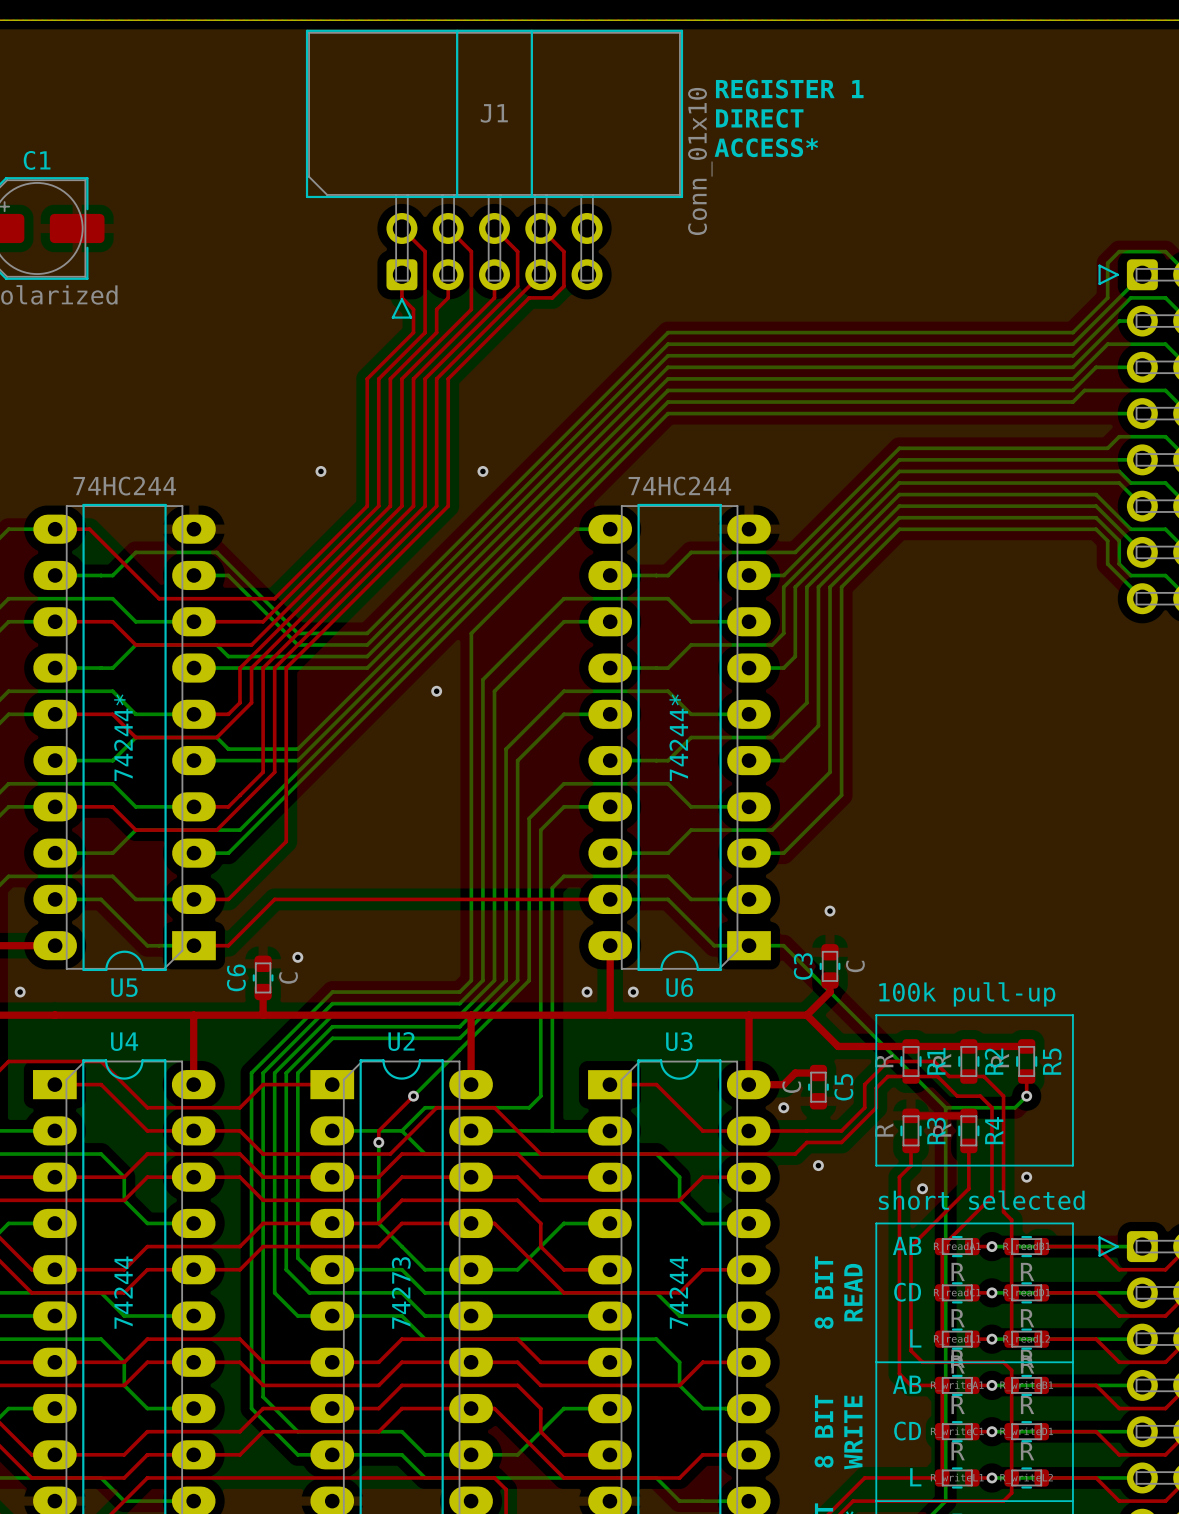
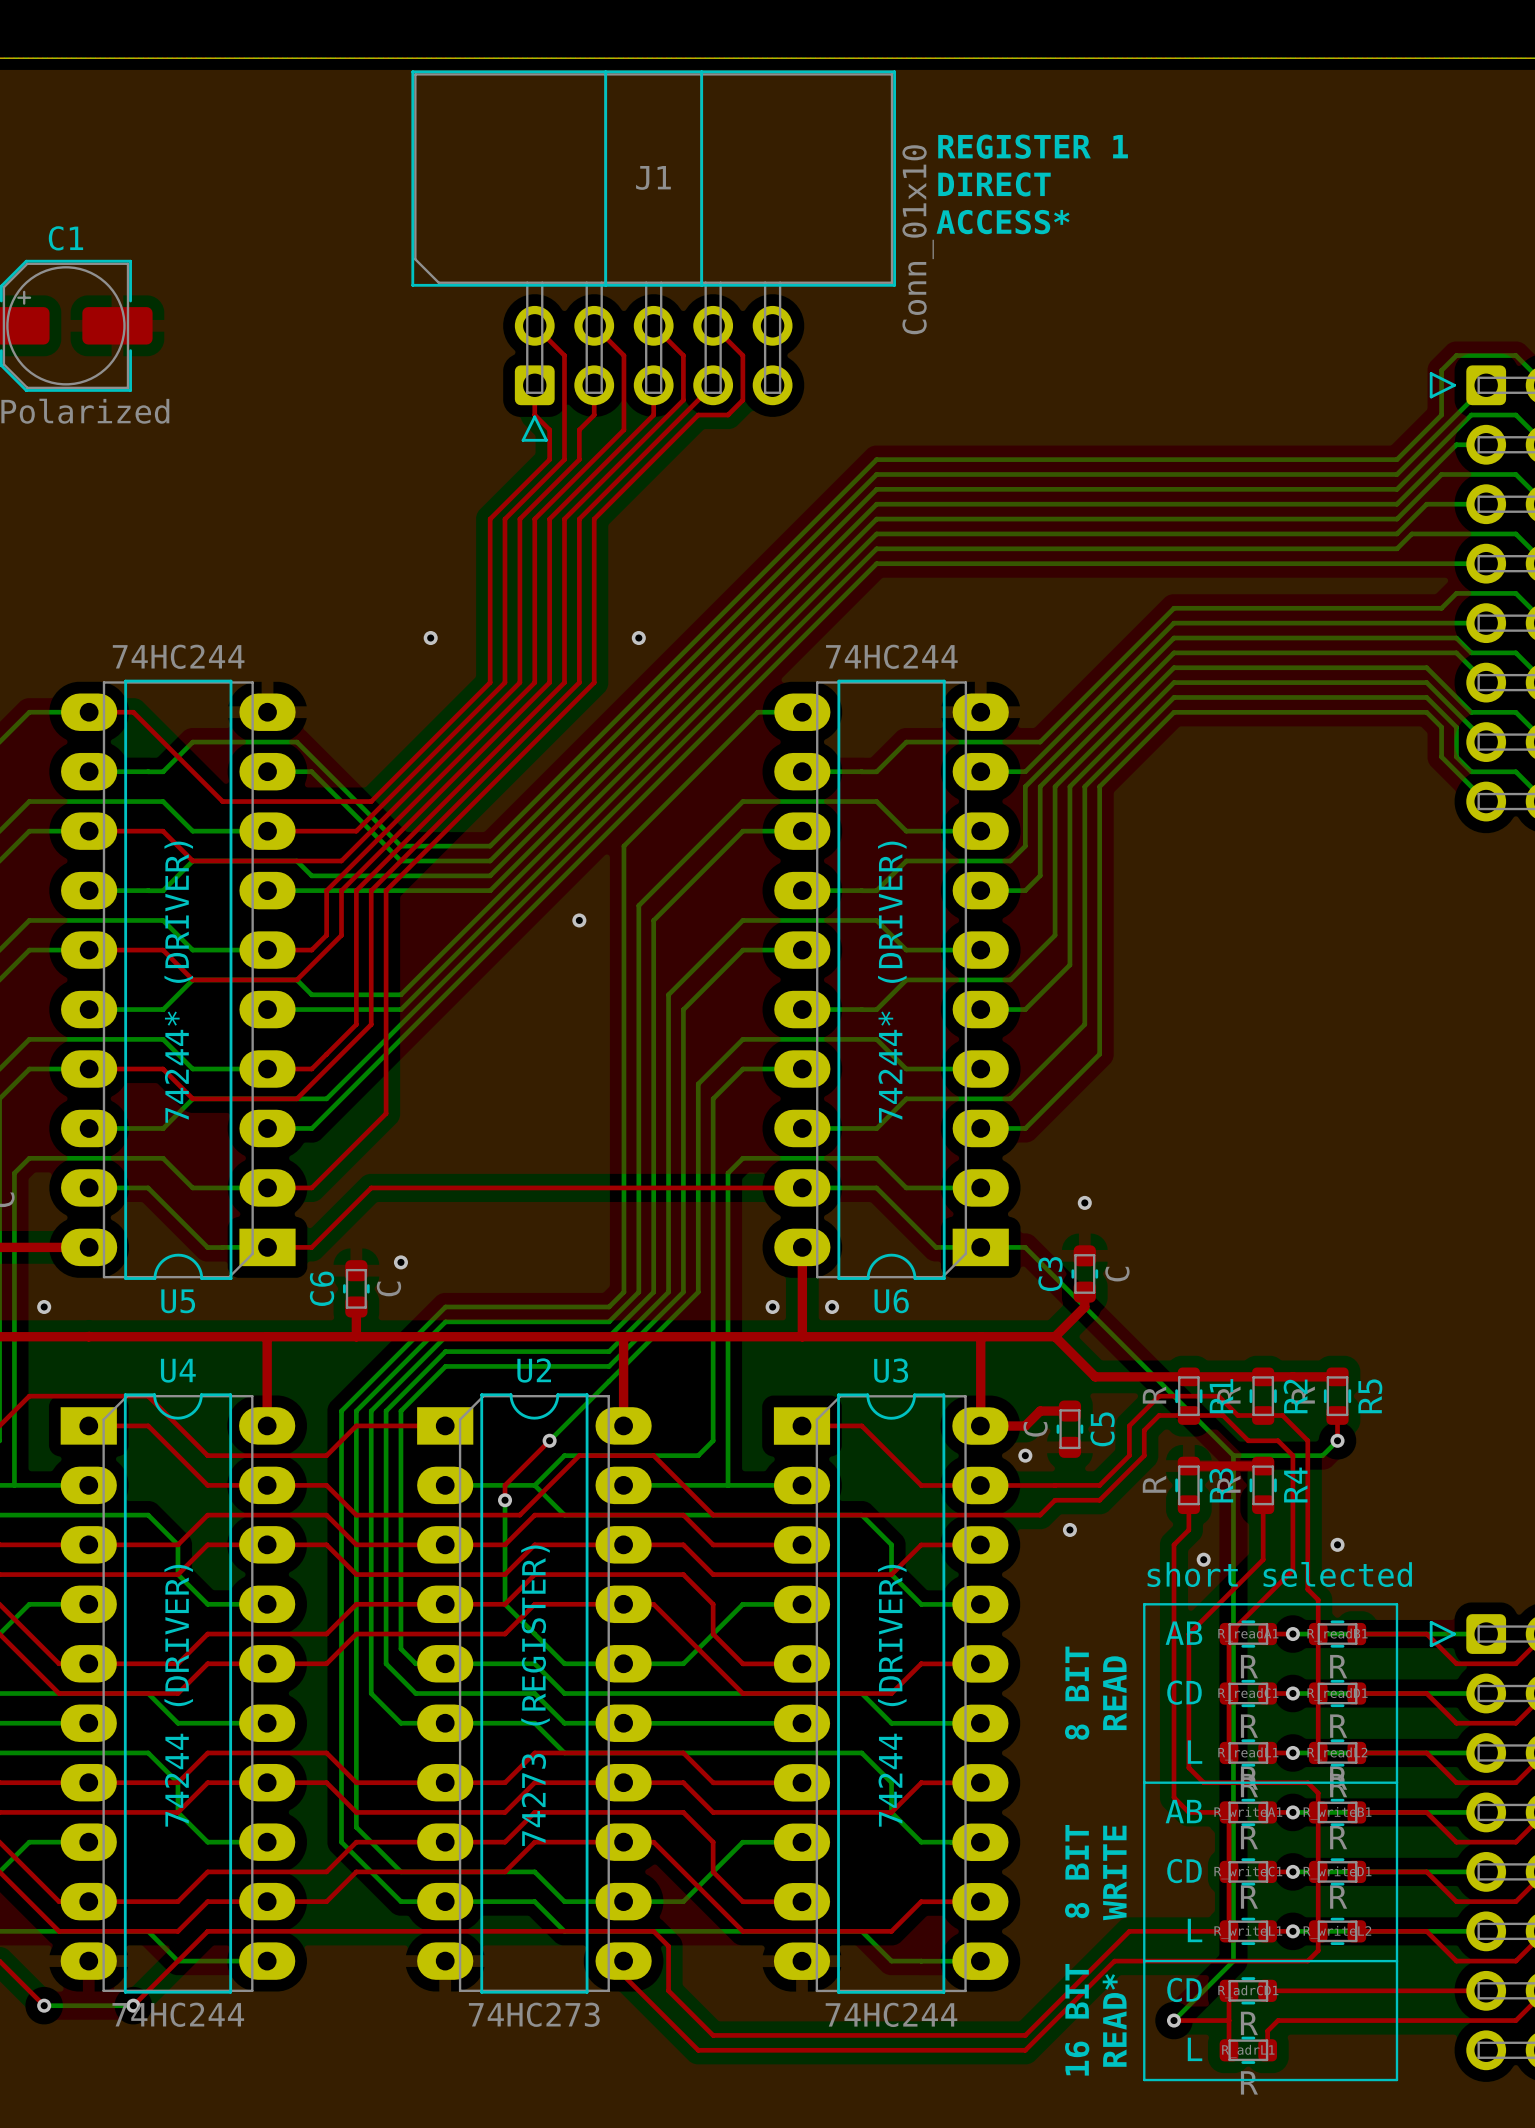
text: 74244* (123, 737) -> 74244* (DRIVER) (178, 982)
text: 74244* (678, 737) -> 74244* (DRIVER) (892, 982)
text: 100k pull-up (967, 994) -> none
line: (876, 1015) (1072, 1015) (1072, 1165) (876, 1165) (876, 1015) -> none
text: 74244 (123, 1292) -> 74244 (DRIVER) (178, 1695)
text: 74273 (401, 1292) -> 74273 (REGISTER) (535, 1695)
text: 74244 (678, 1292) -> 74244 (DRIVER) (892, 1695)

